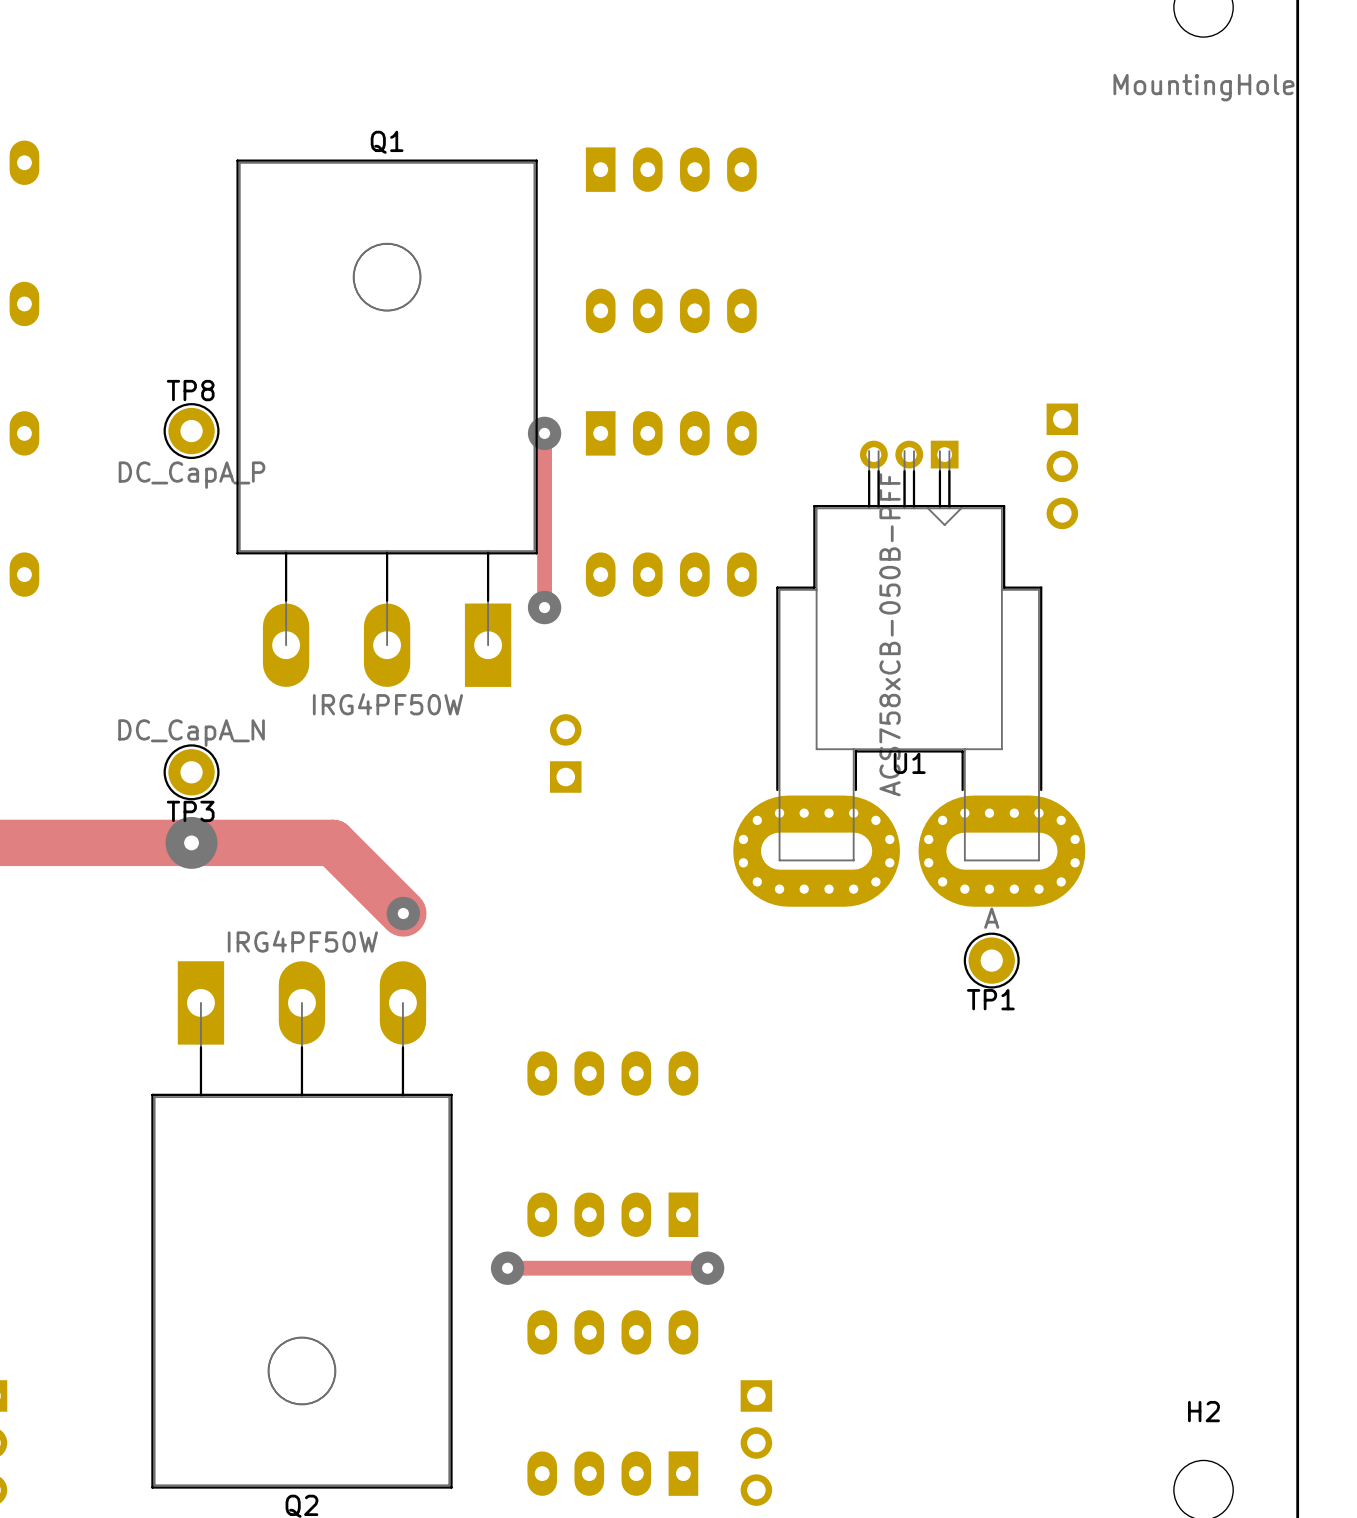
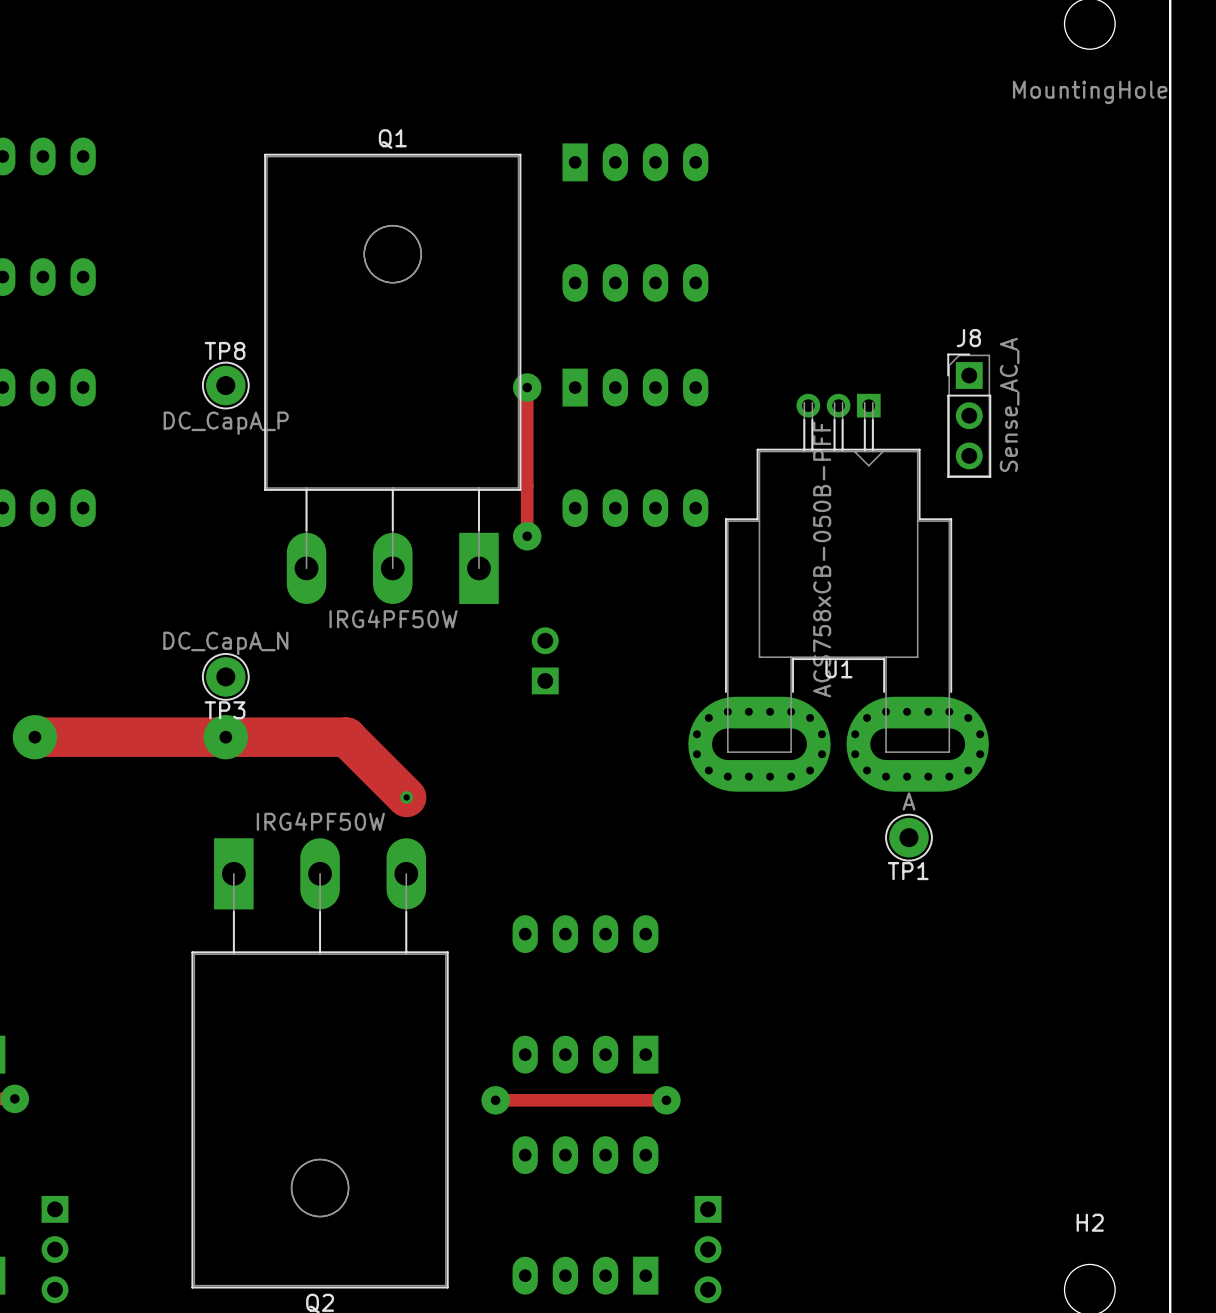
J8 side: bottom (1062, 466) -> top (969, 415)
via size: [386, 896, 421, 931] -> [400, 791, 413, 804]

